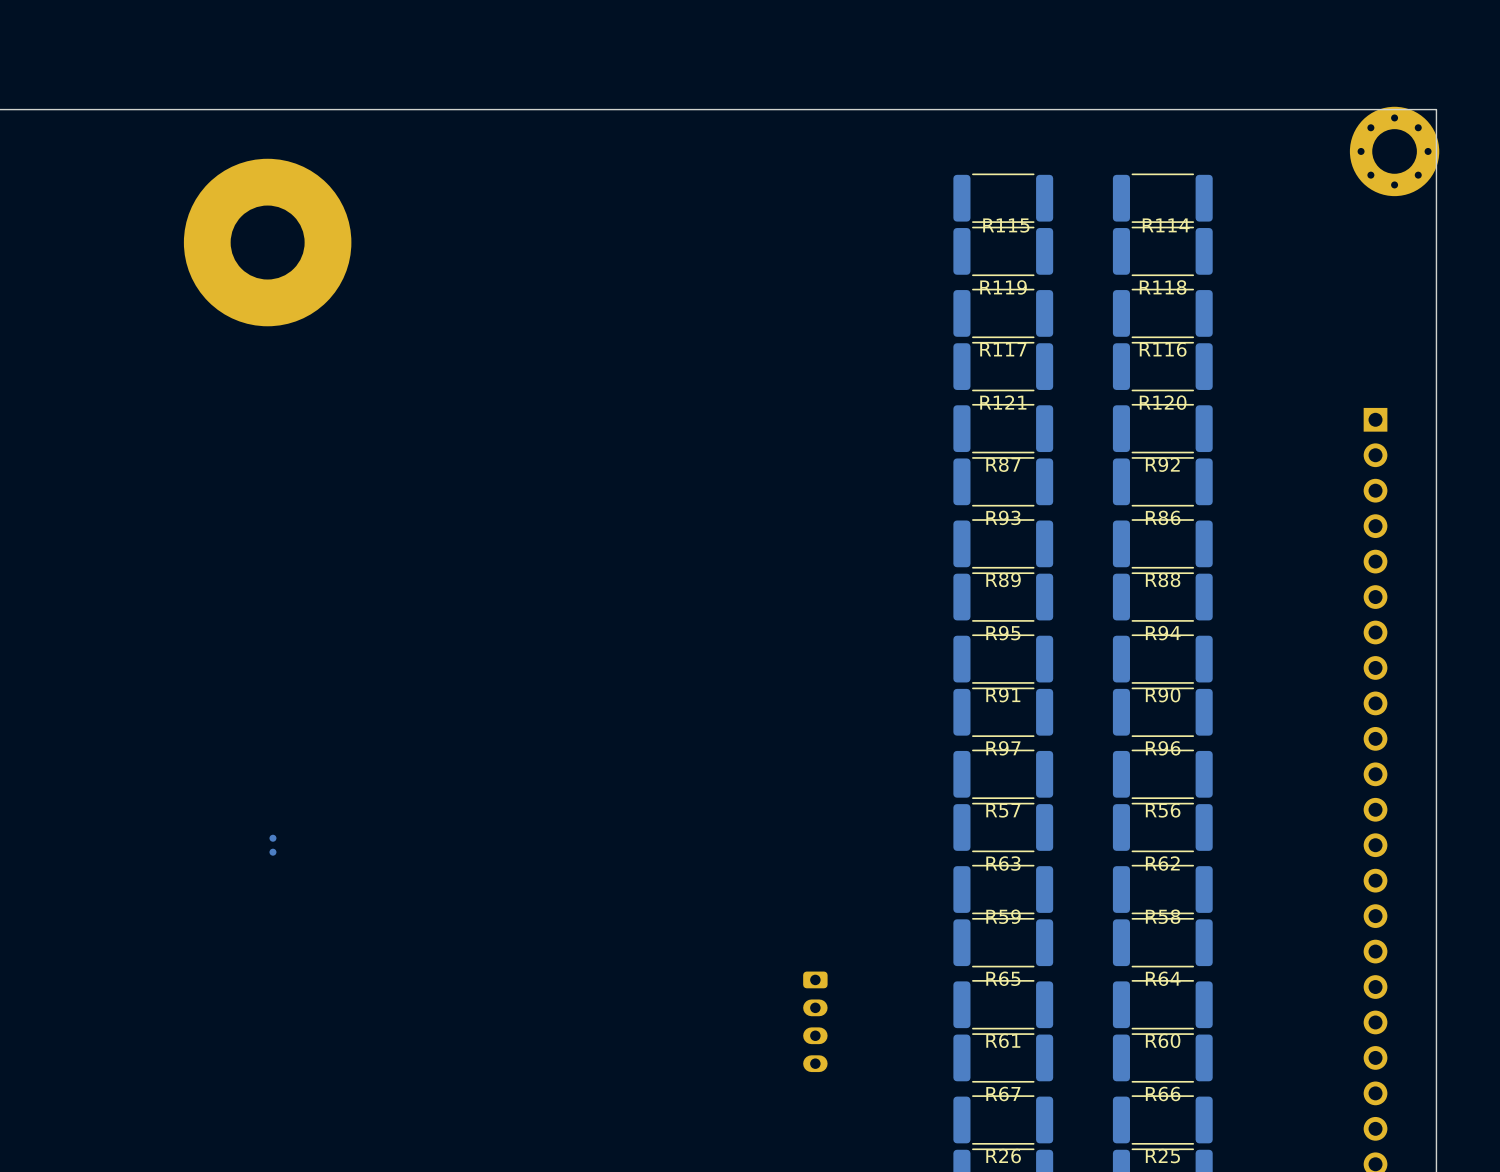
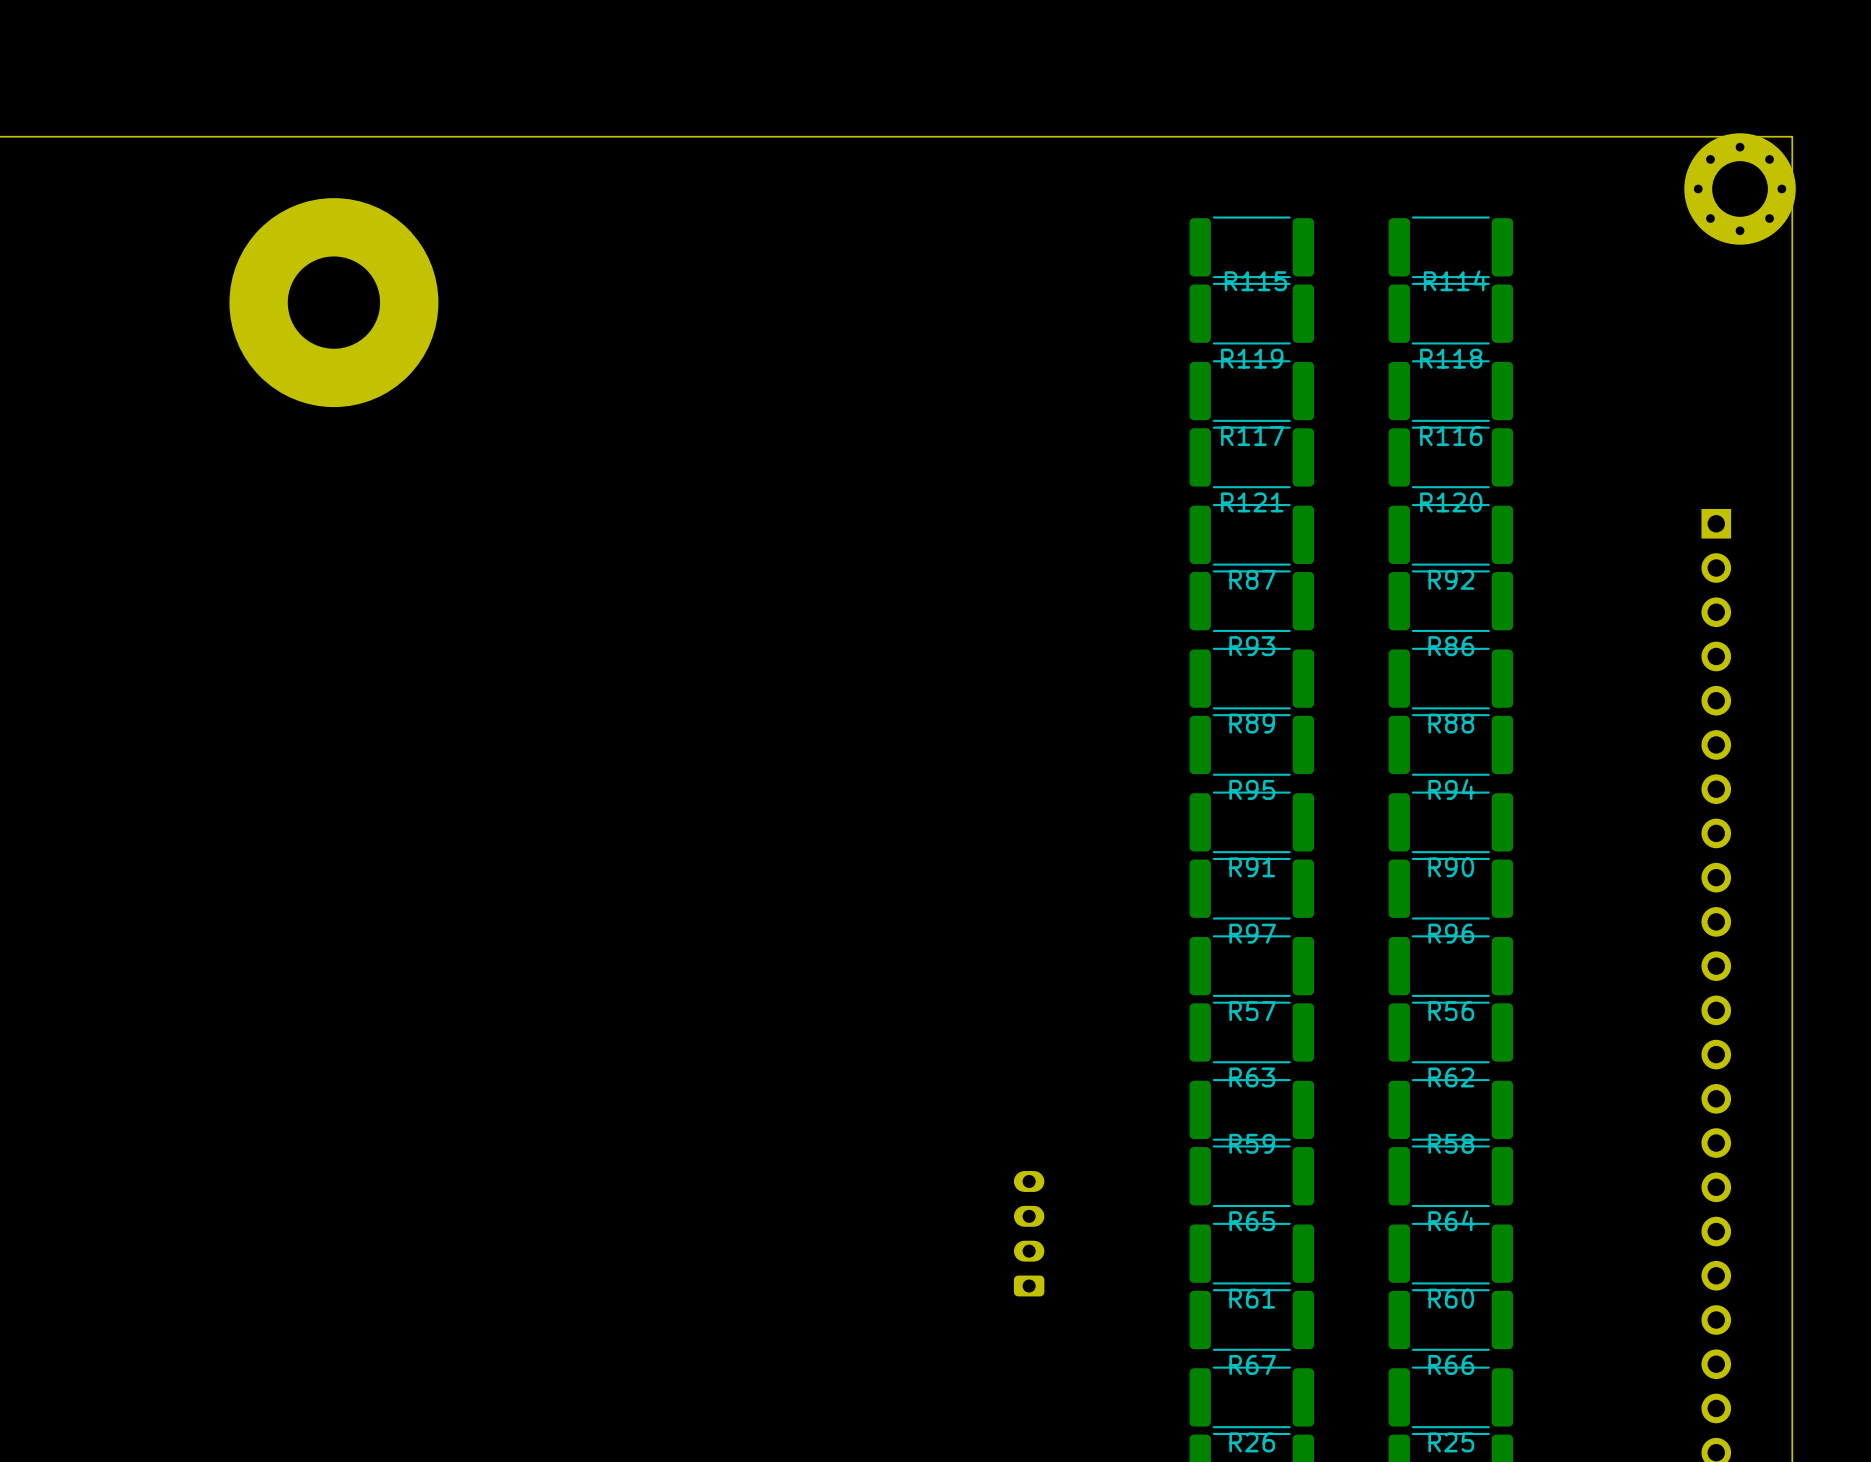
part: (272, 845) -> none
part rotation: 0° (815, 1021) -> 180° (1029, 1233)

